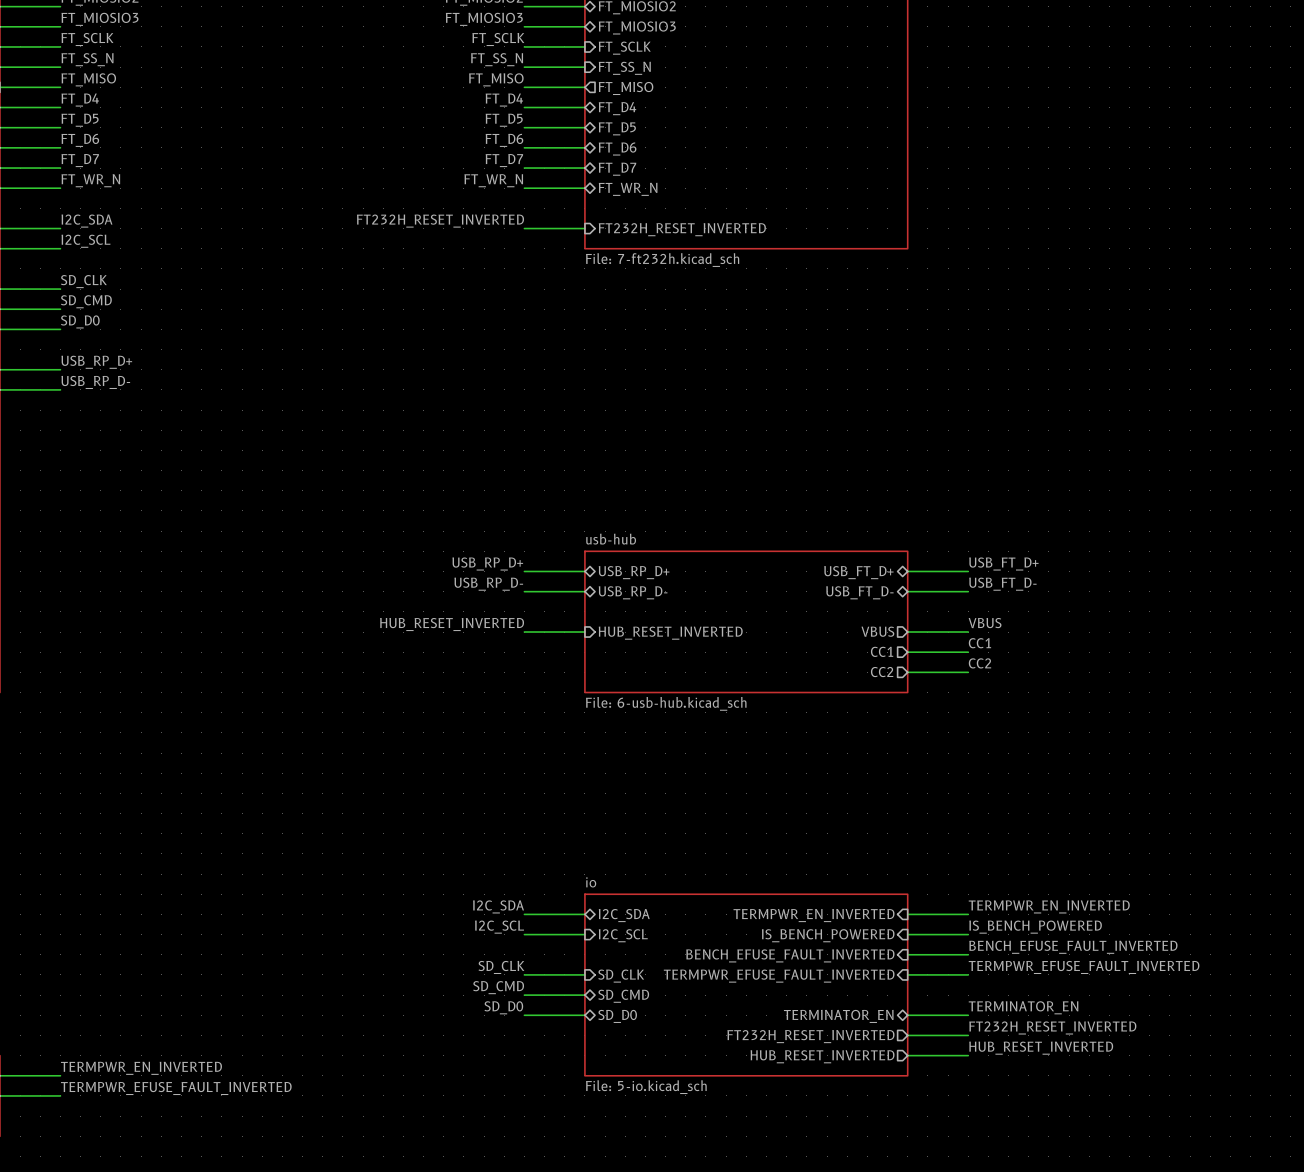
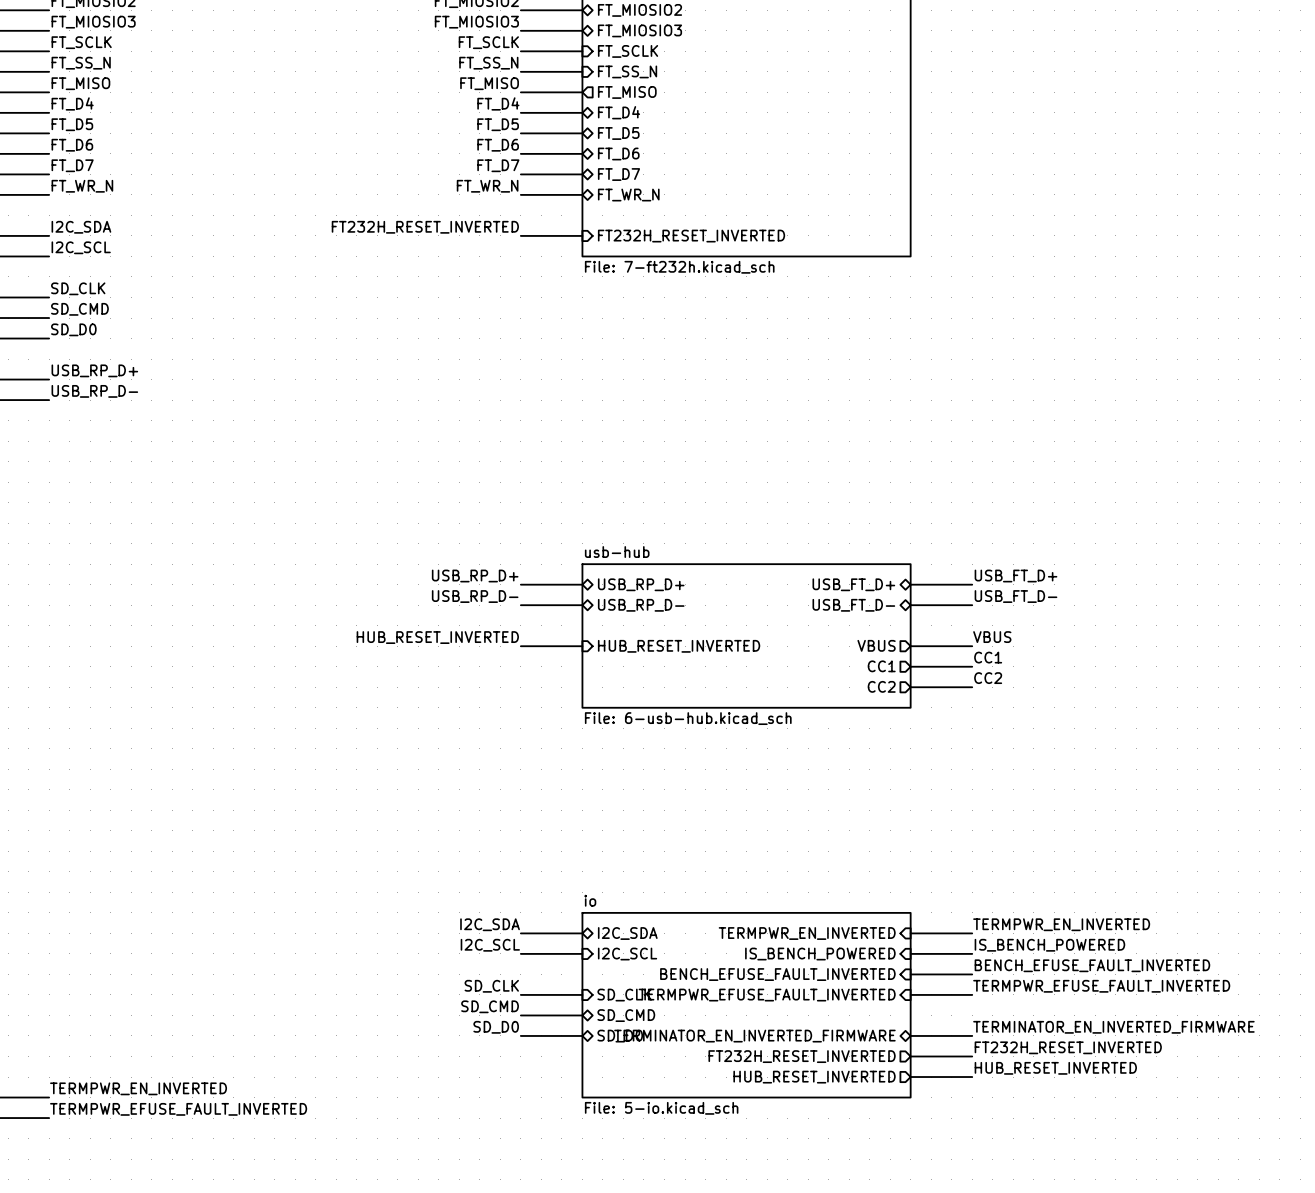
label: TERMINATOR_EN (1023, 1007) -> TERMINATOR_EN_INVERTED_FIRMWARE (1113, 1027)
sheet pin: TERMINATOR_EN (838, 1016) -> TERMINATOR_EN_INVERTED_FIRMWARE (754, 1036)

